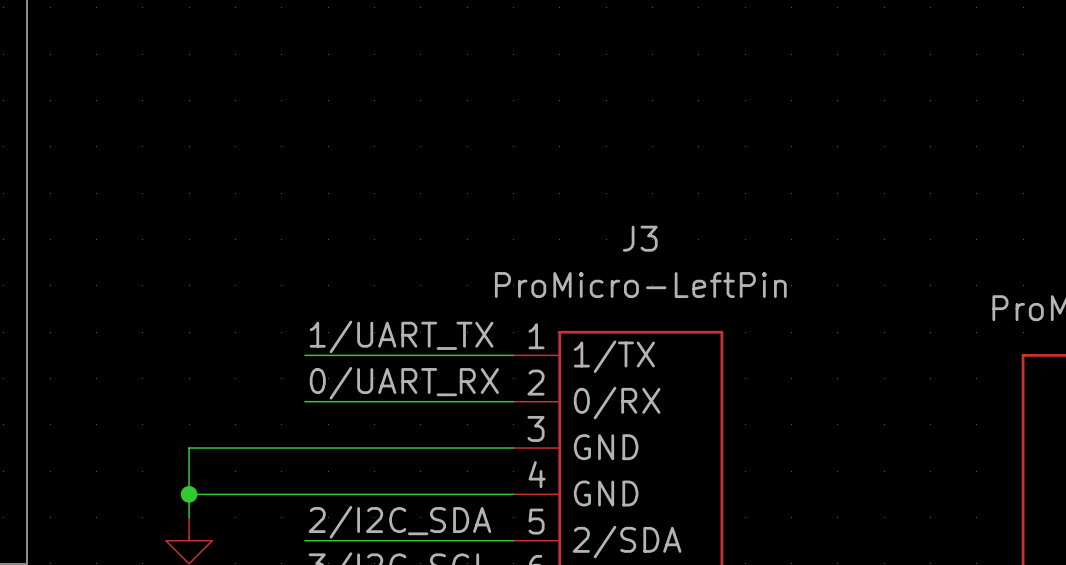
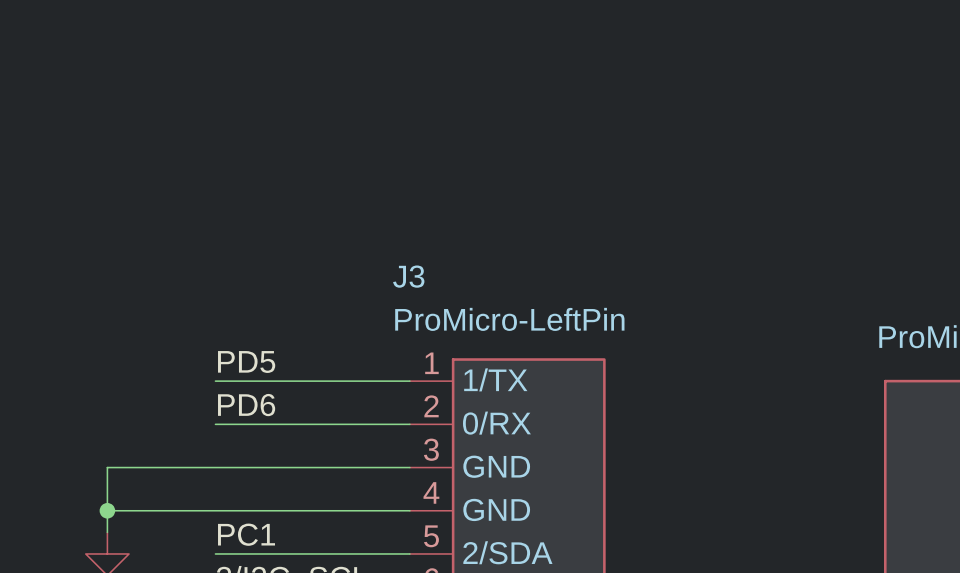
J3 name position: J3 (640, 238) -> J3 (408, 276)
J3 value position: ProMicro-LeftPin (640, 285) -> ProMicro-LeftPin (509, 319)
label: 1/UART_TX (401, 336) -> PD5 (246, 362)
label: 0/UART_RX (404, 383) -> PD6 (246, 405)
label: 2/I2C_SDA (399, 522) -> PC1 (246, 534)

